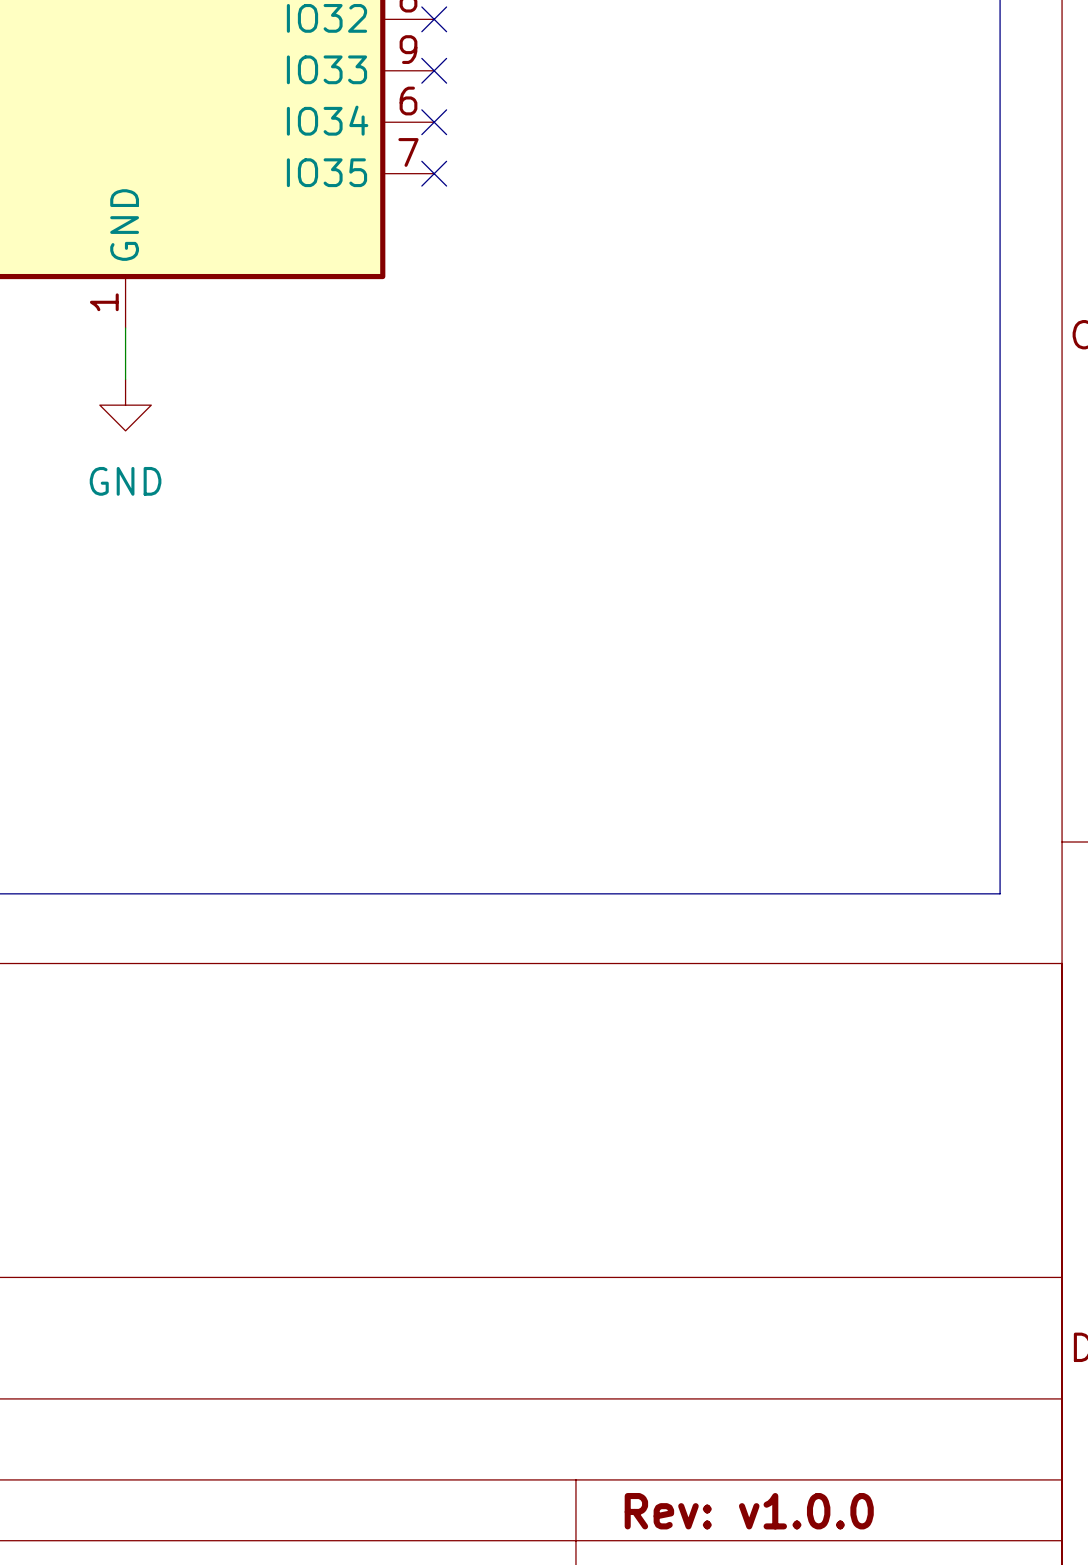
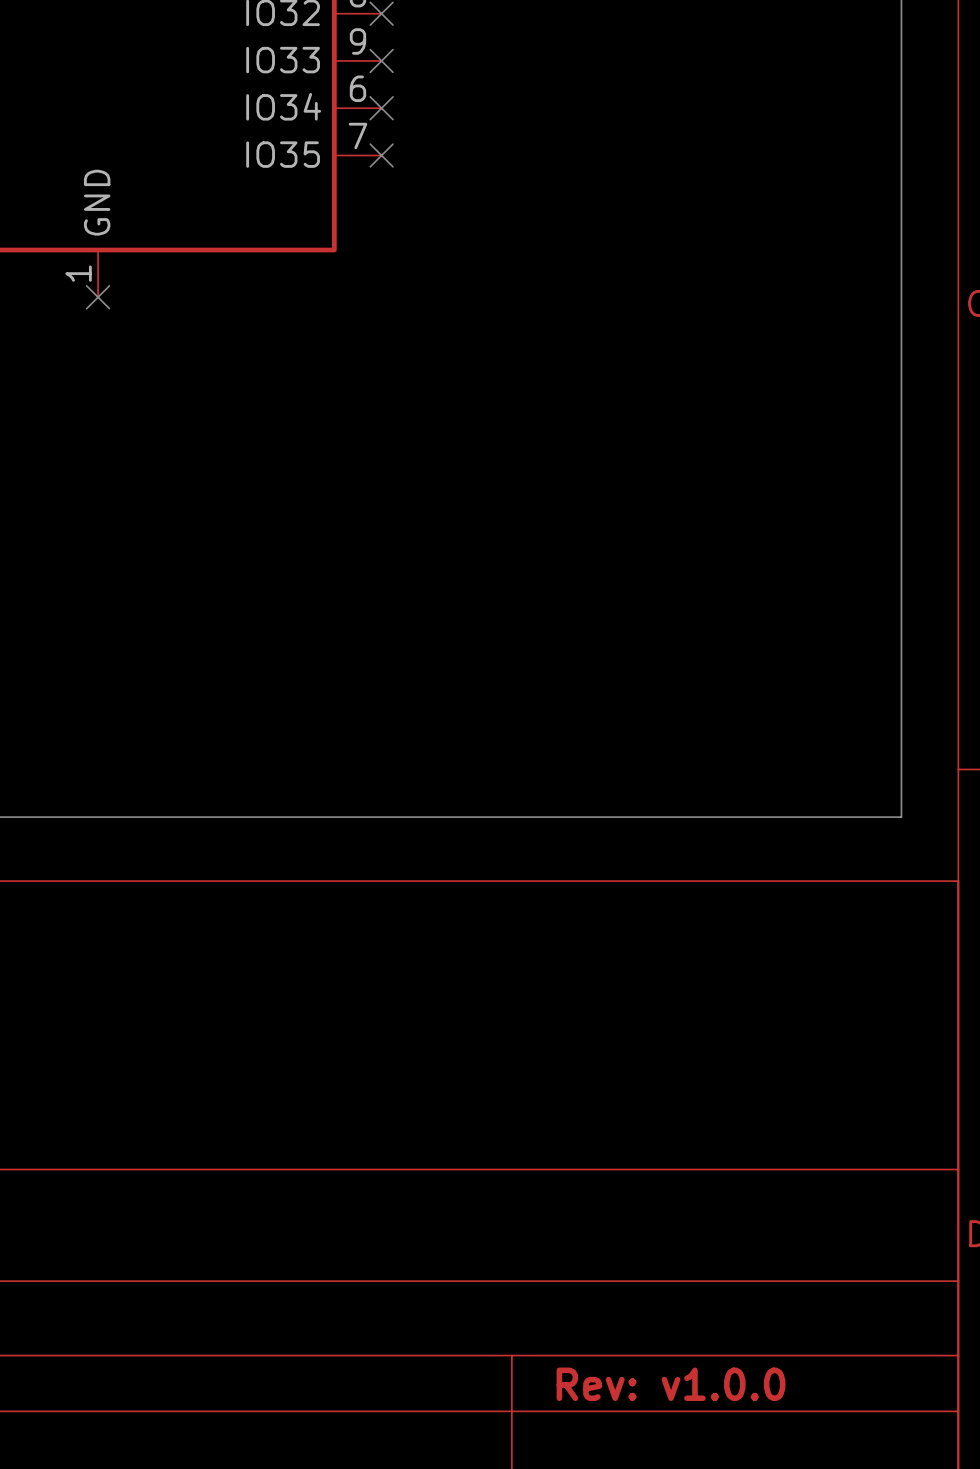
wire: (125, 327) (125, 379) -> none
no-connect mark: none -> (98, 297)
power symbol: GND (125, 405) -> none

